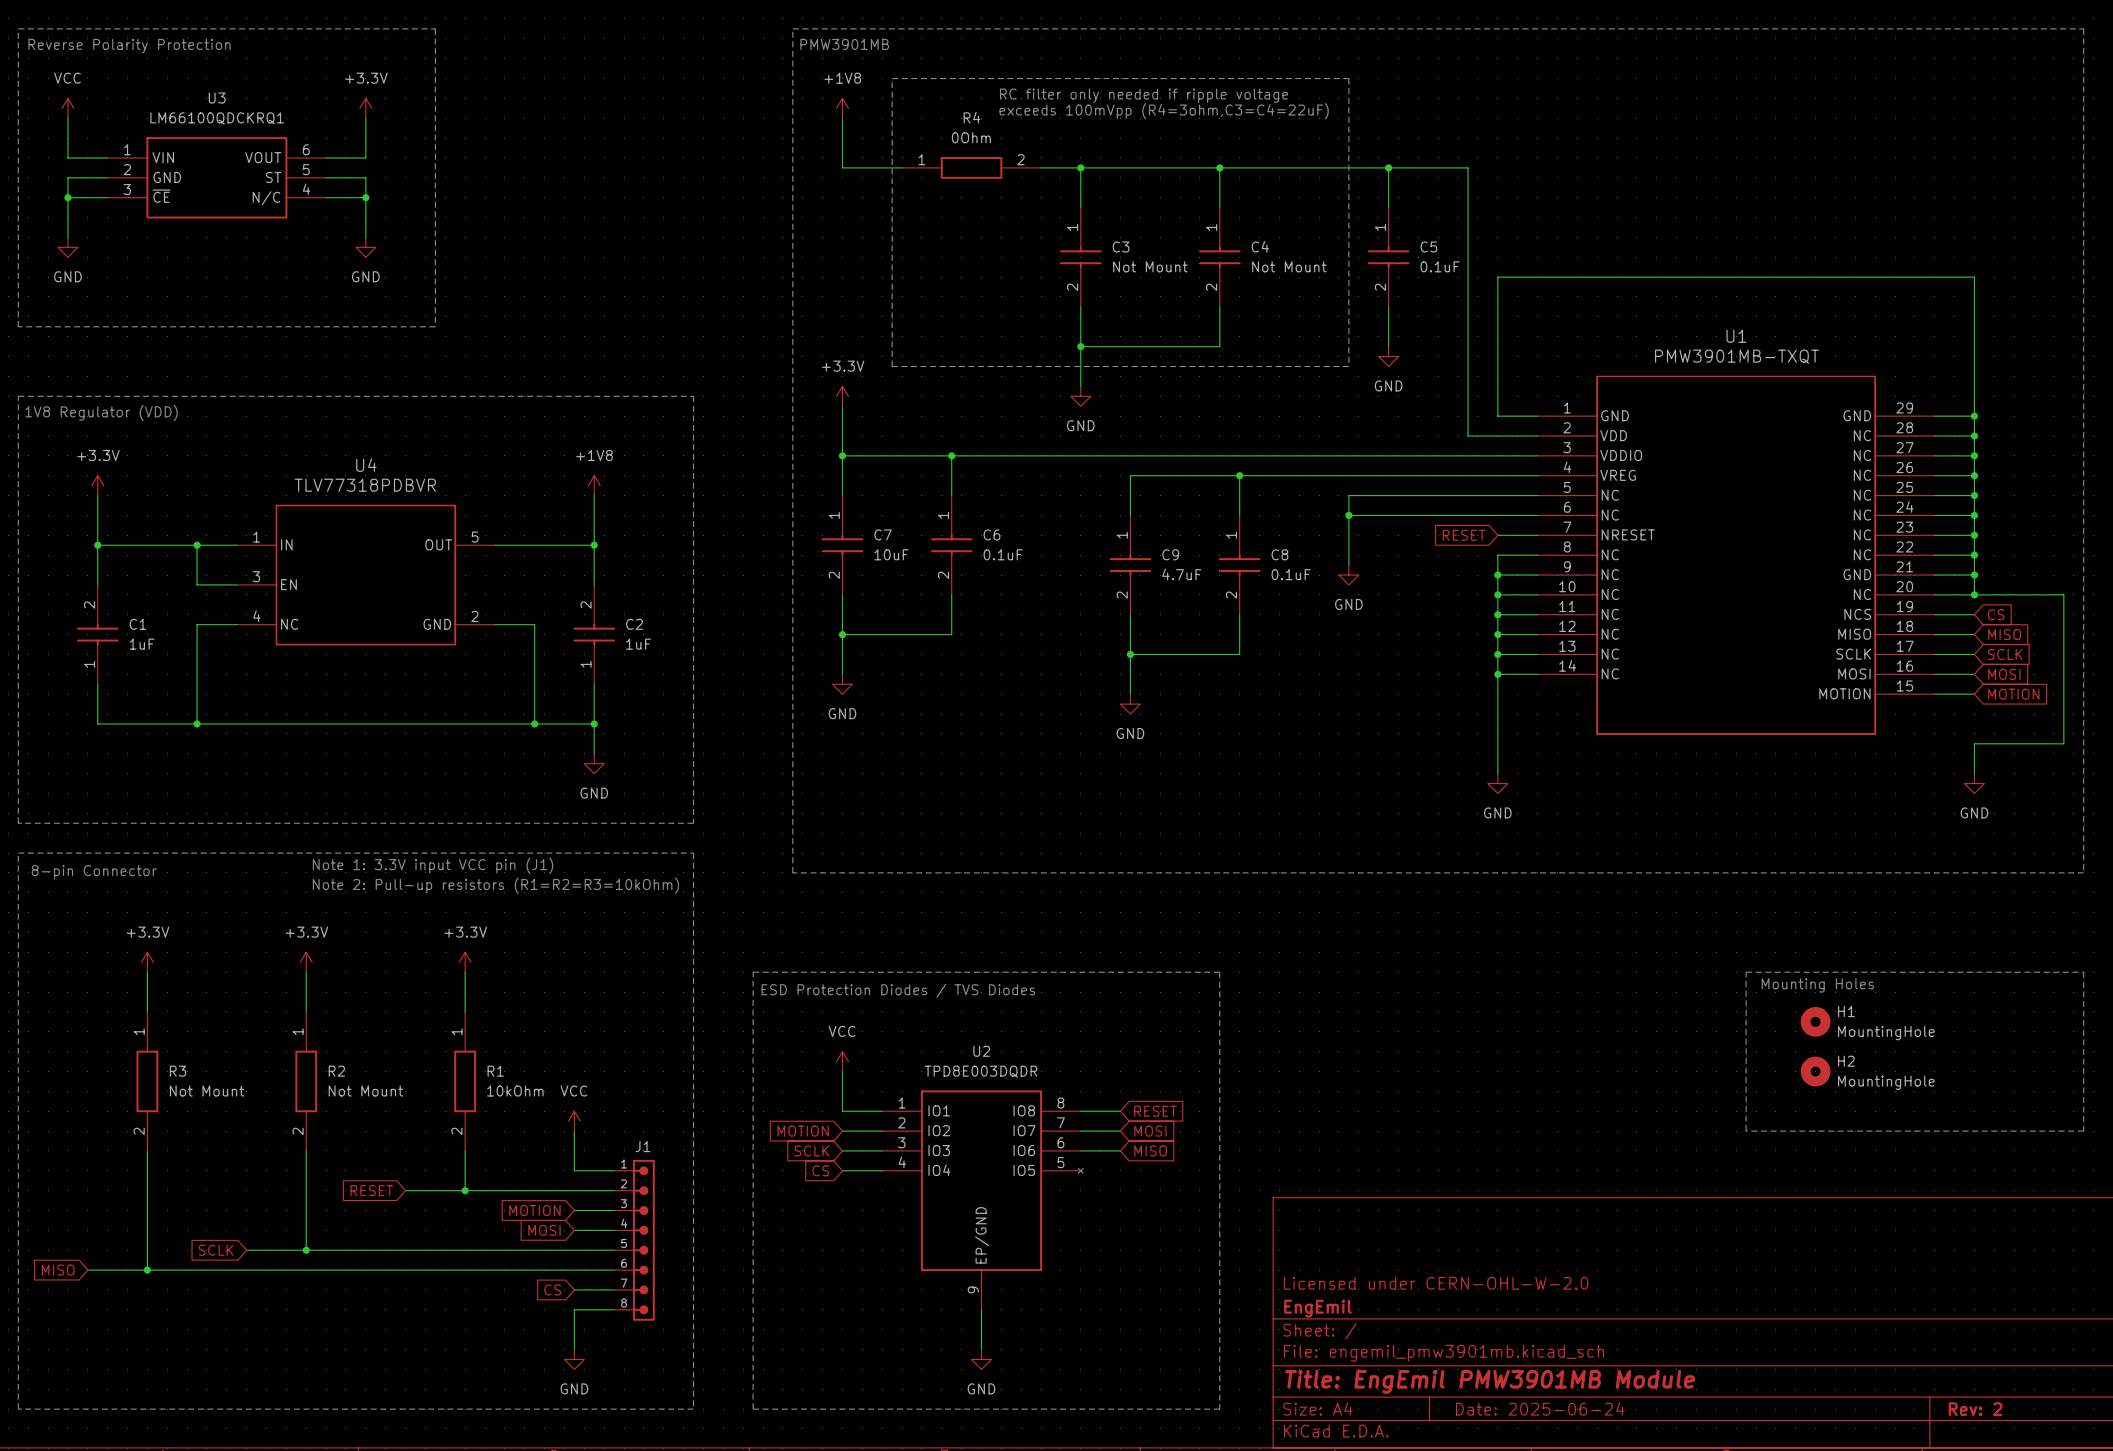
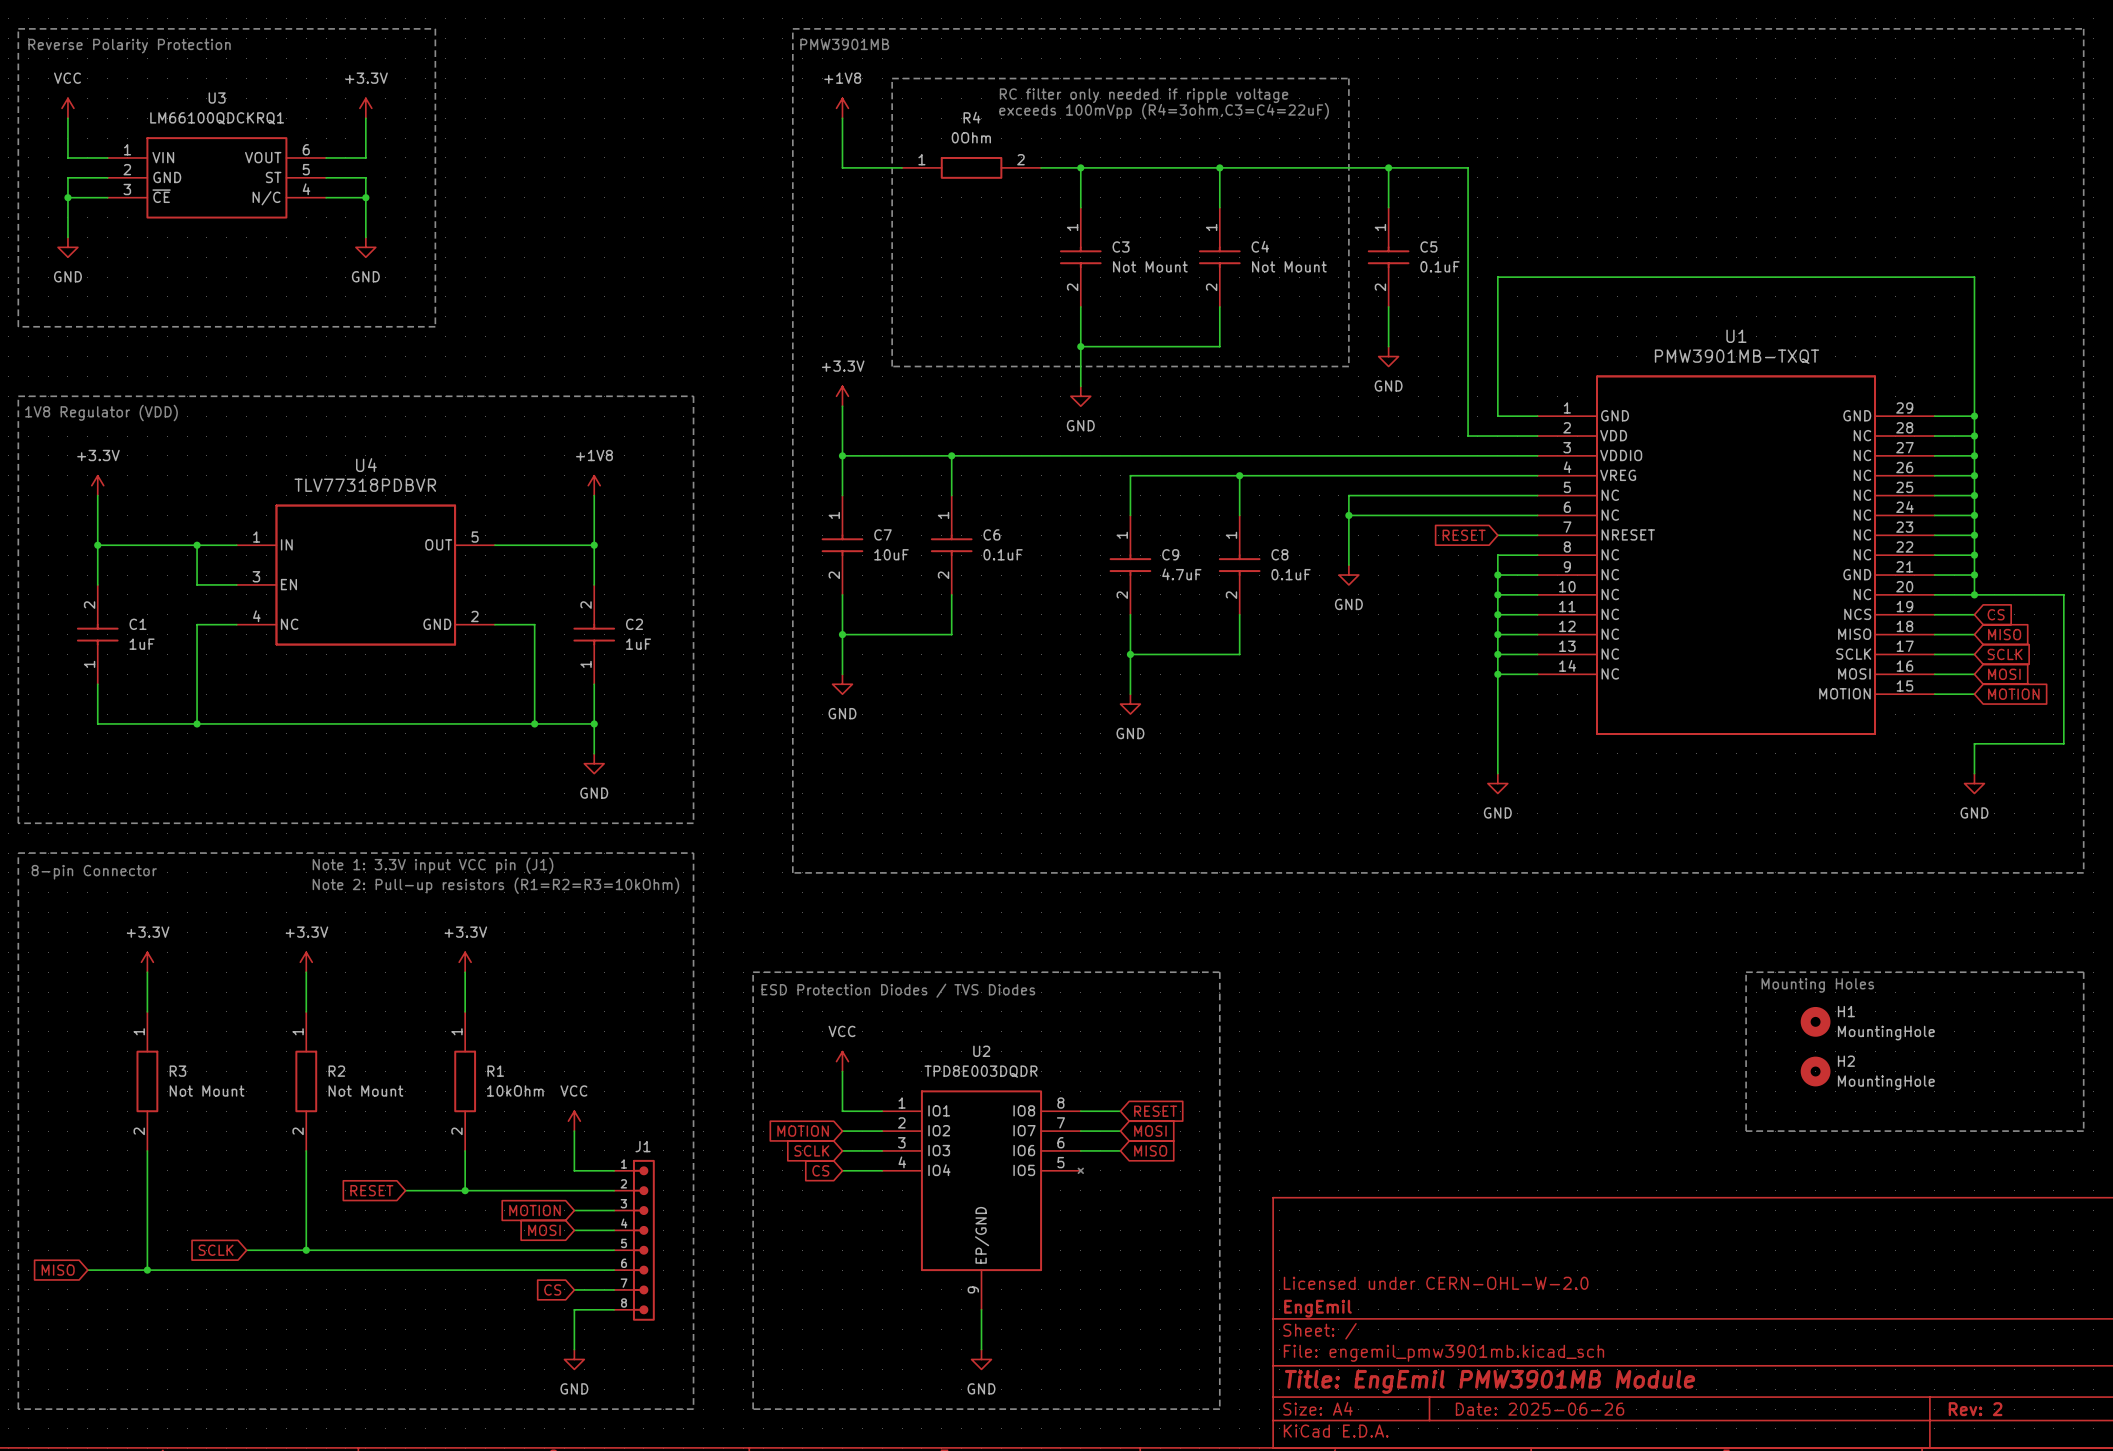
title block: Date: 2025-06-24 (1540, 1408) -> Date: 2025-06-26 (1540, 1409)

